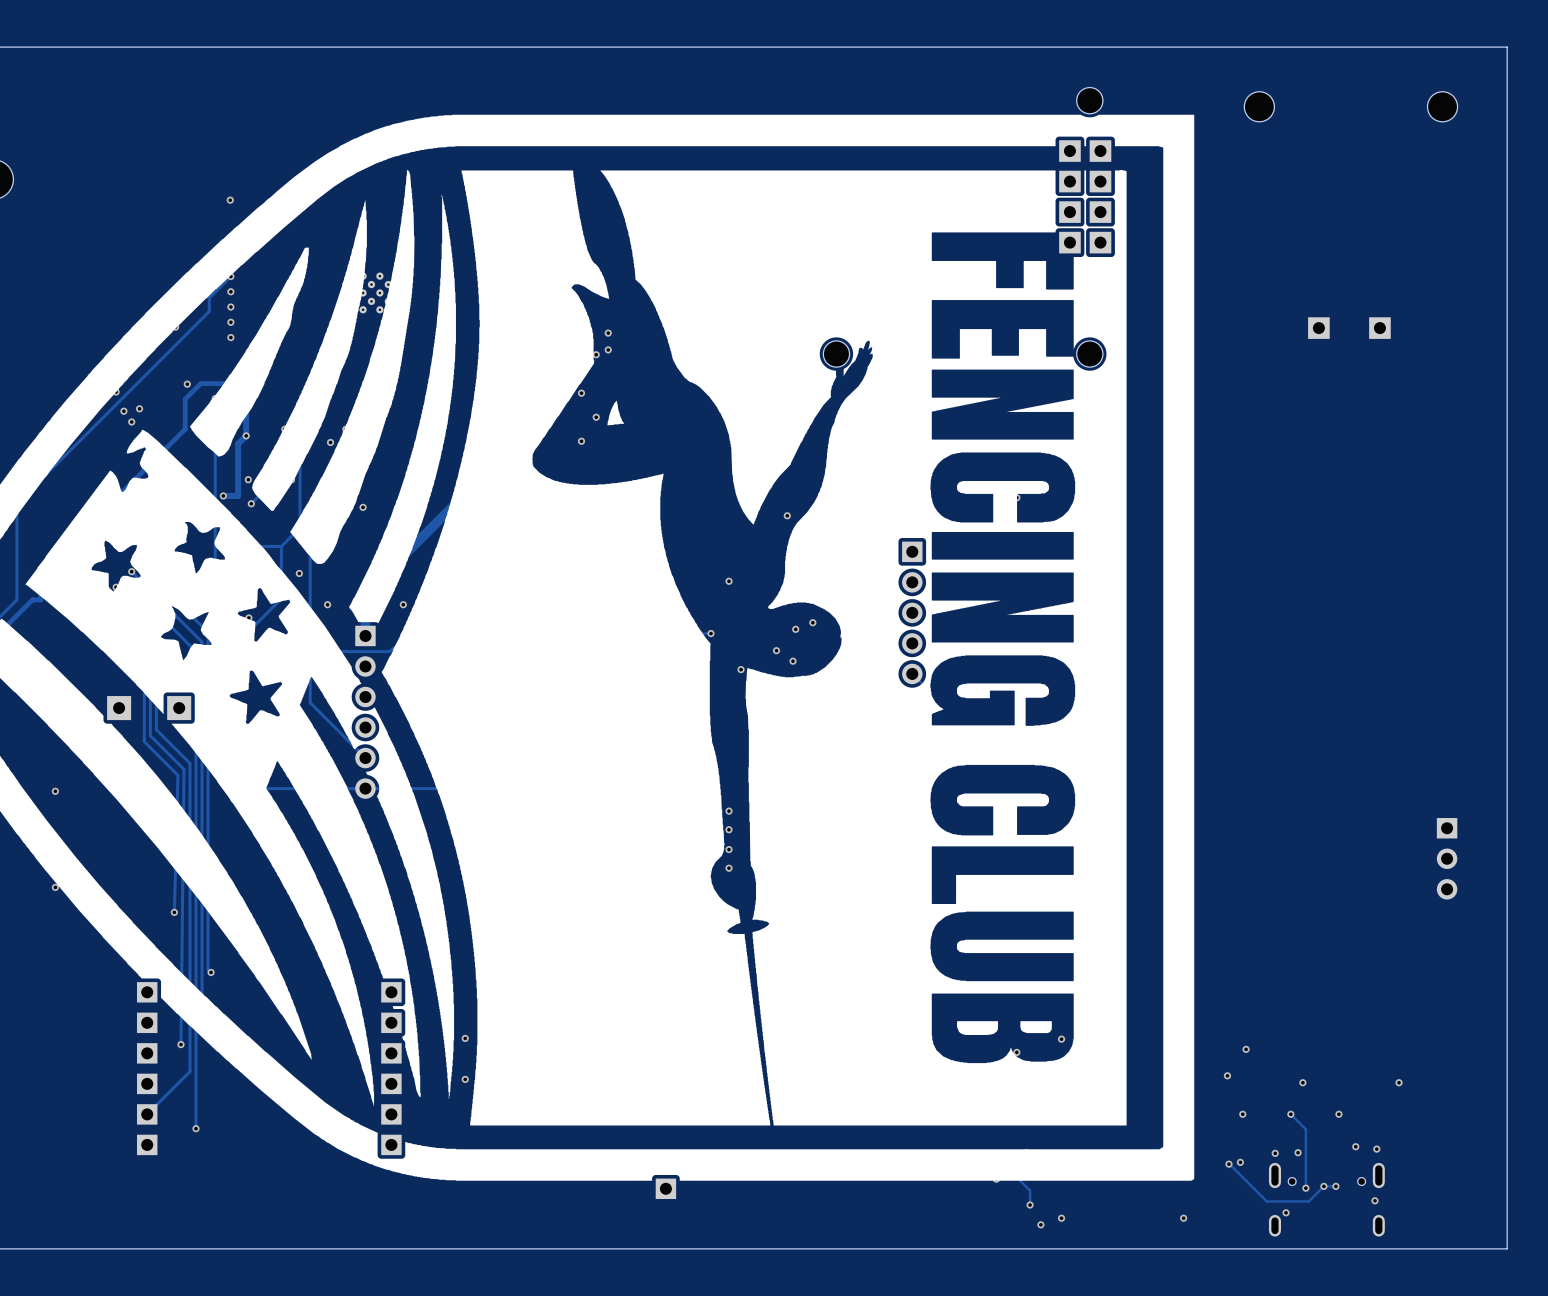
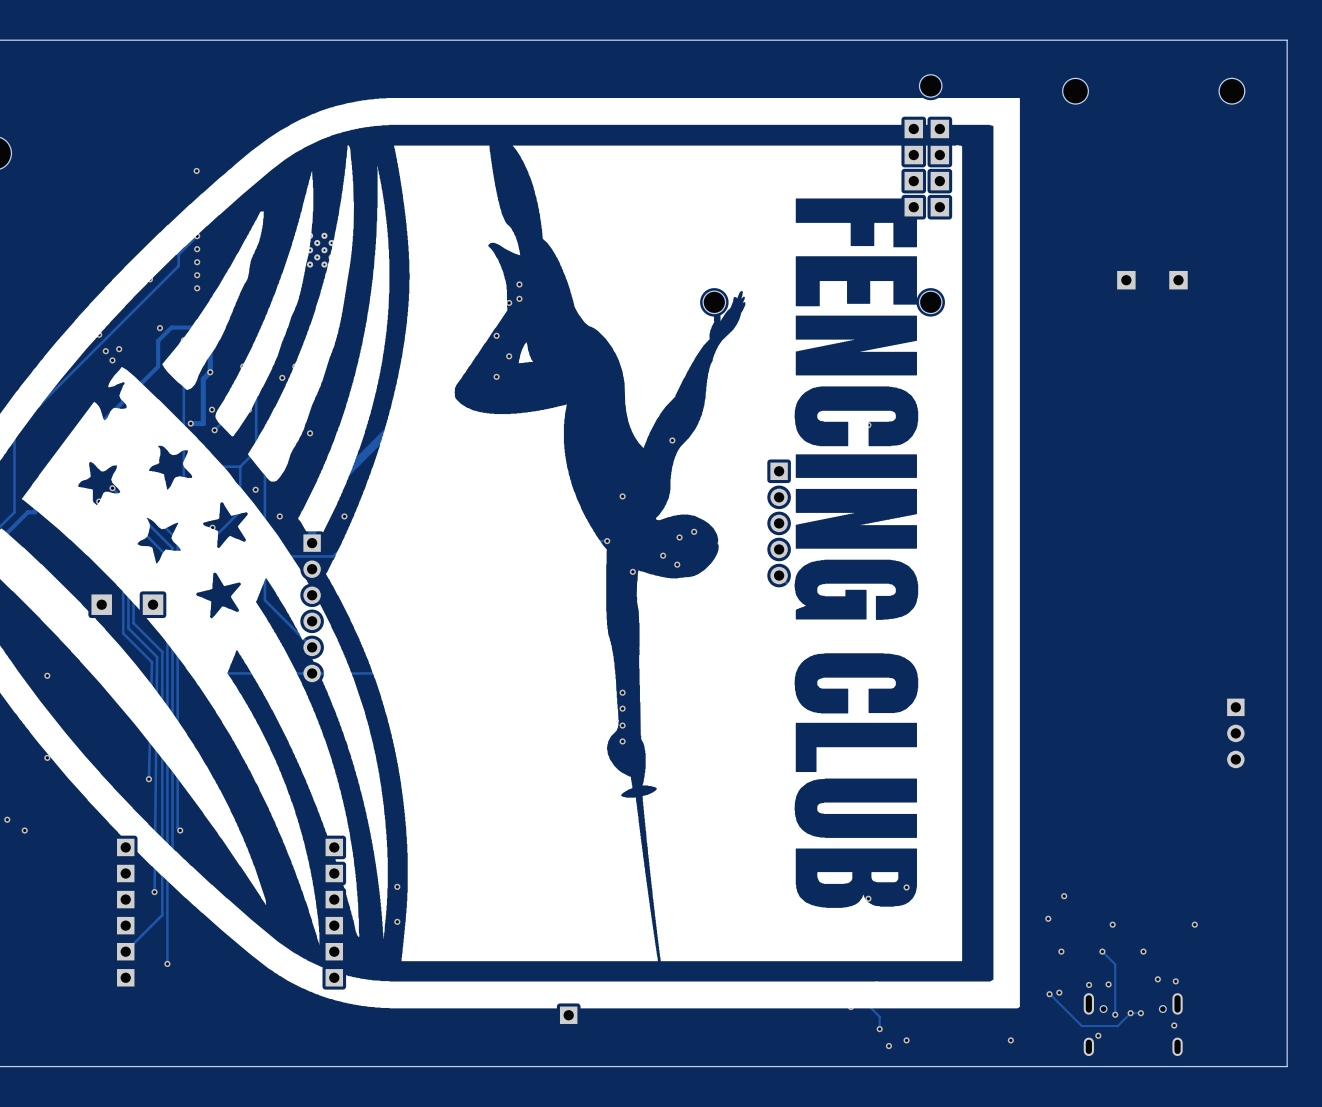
via: none -> (7, 819)
via: none -> (24, 830)

